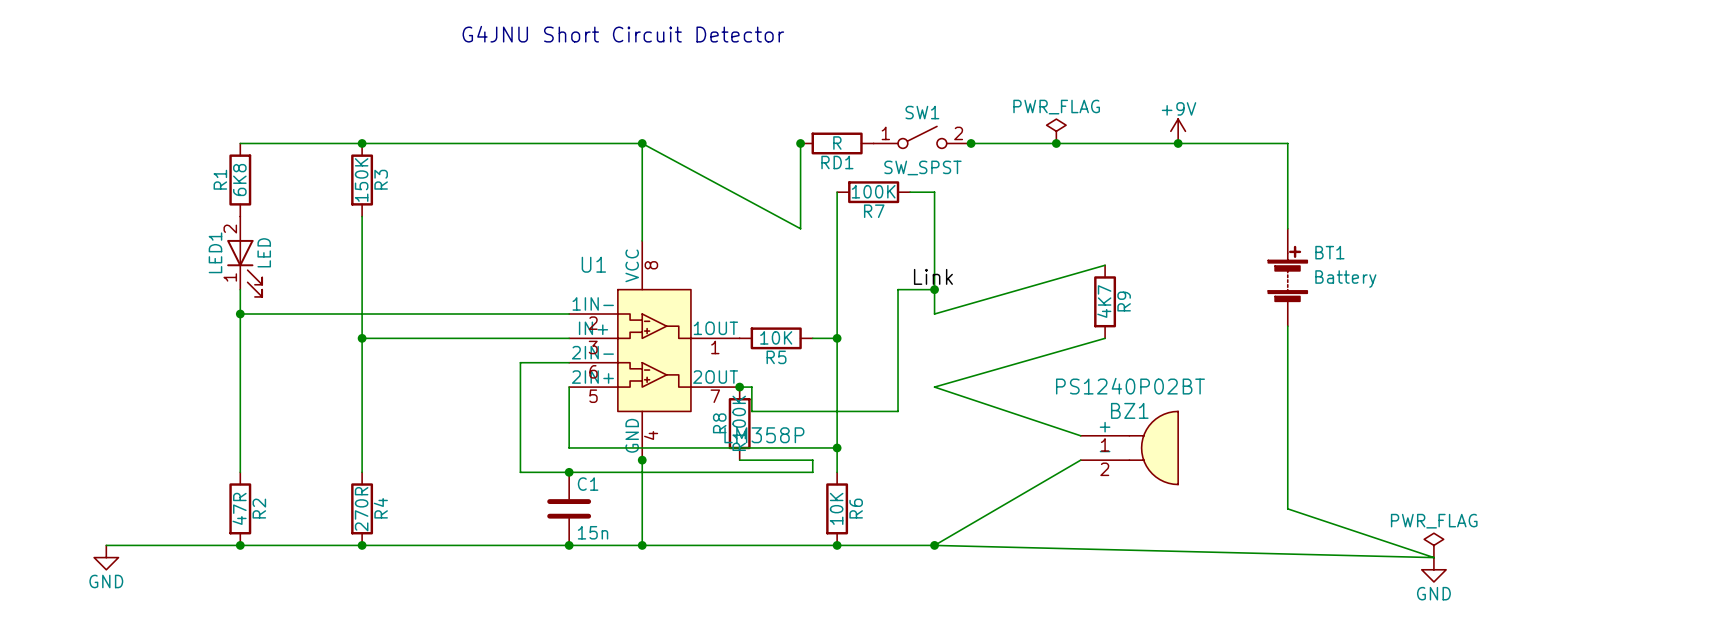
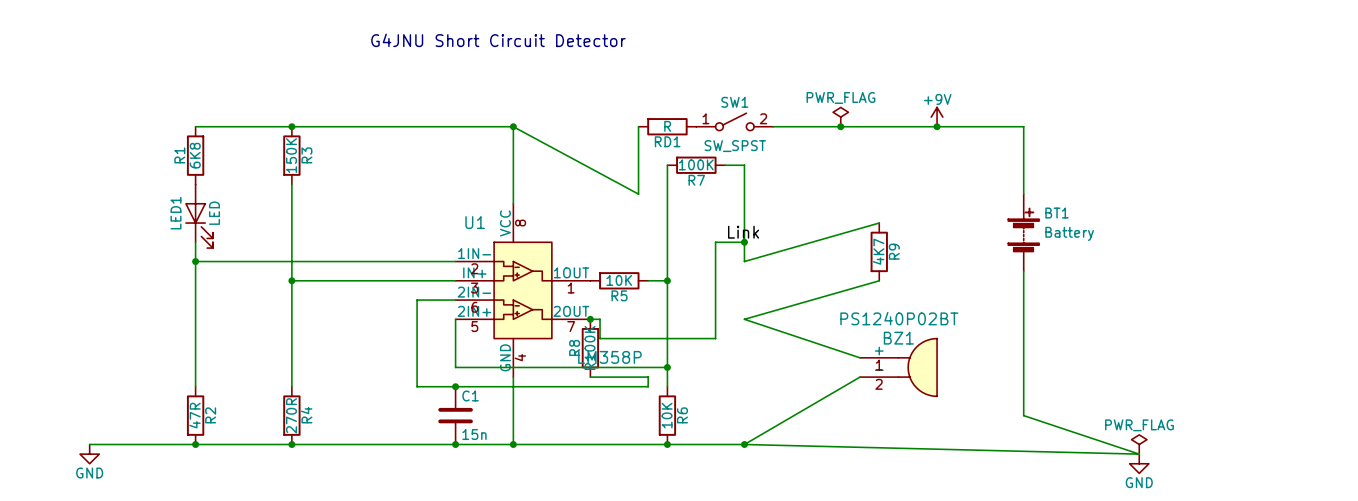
junction: (800, 143) -> none
junction: (971, 143) -> none
LED1 pin number: 2 (230, 229) -> none
LED1 pin number: 1 (230, 277) -> none
junction: (642, 460) -> none

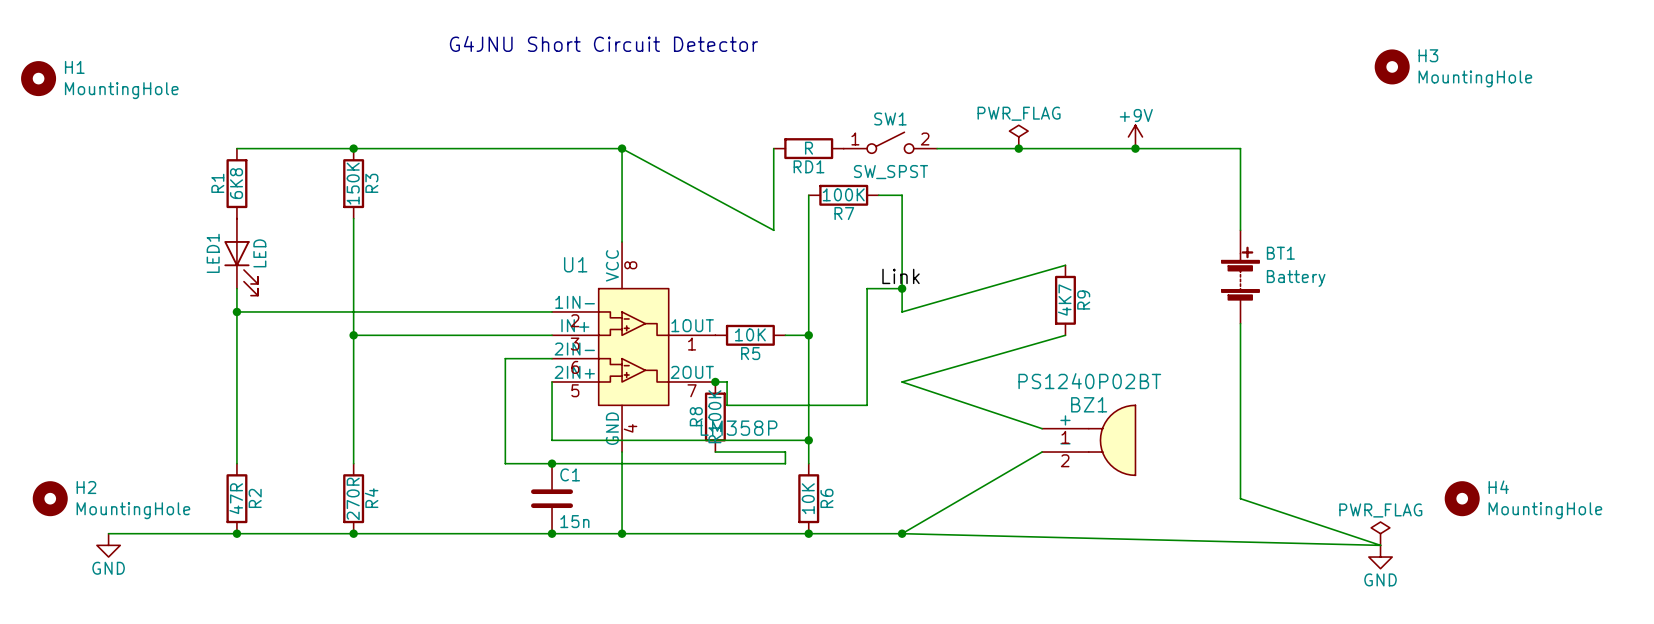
H3: none -> MountingHole (1392, 66)
H1: none -> MountingHole (38, 78)
H2: none -> MountingHole (50, 498)
H4: none -> MountingHole (1462, 498)

